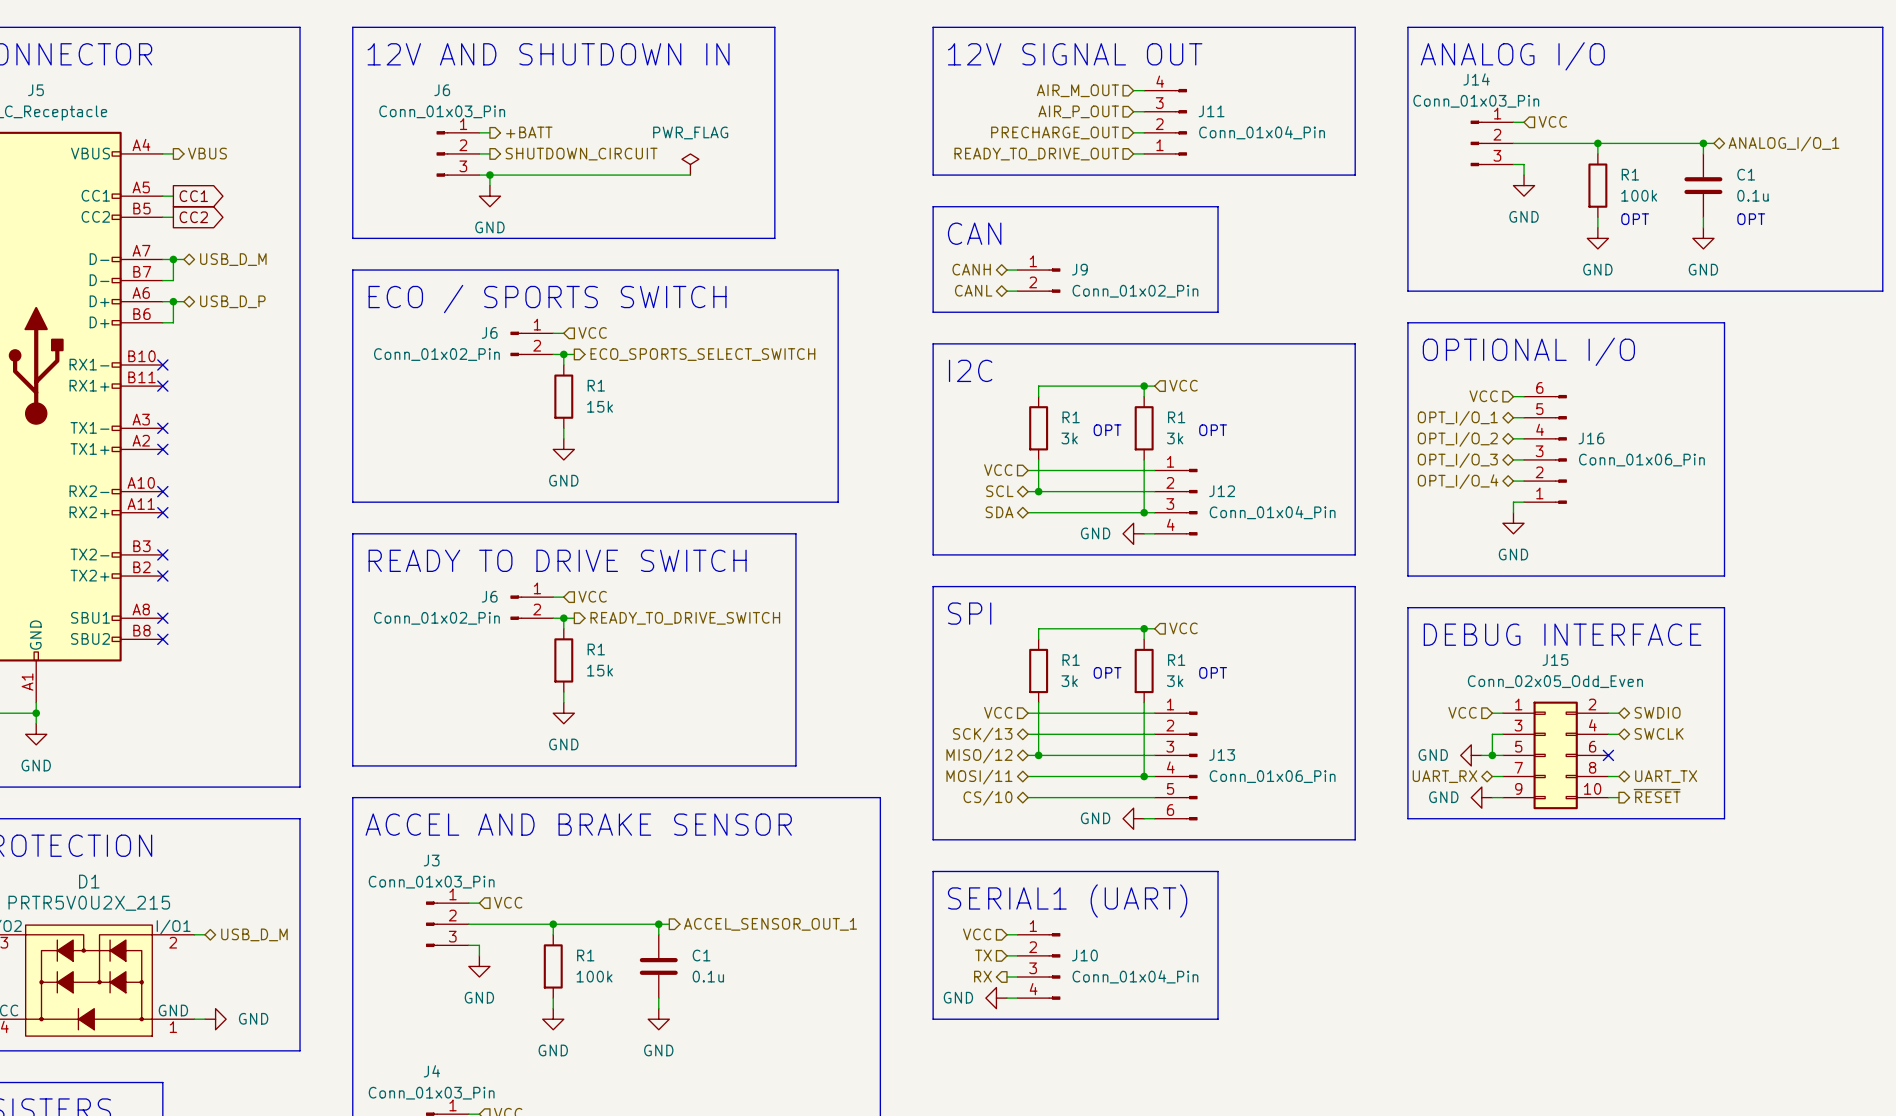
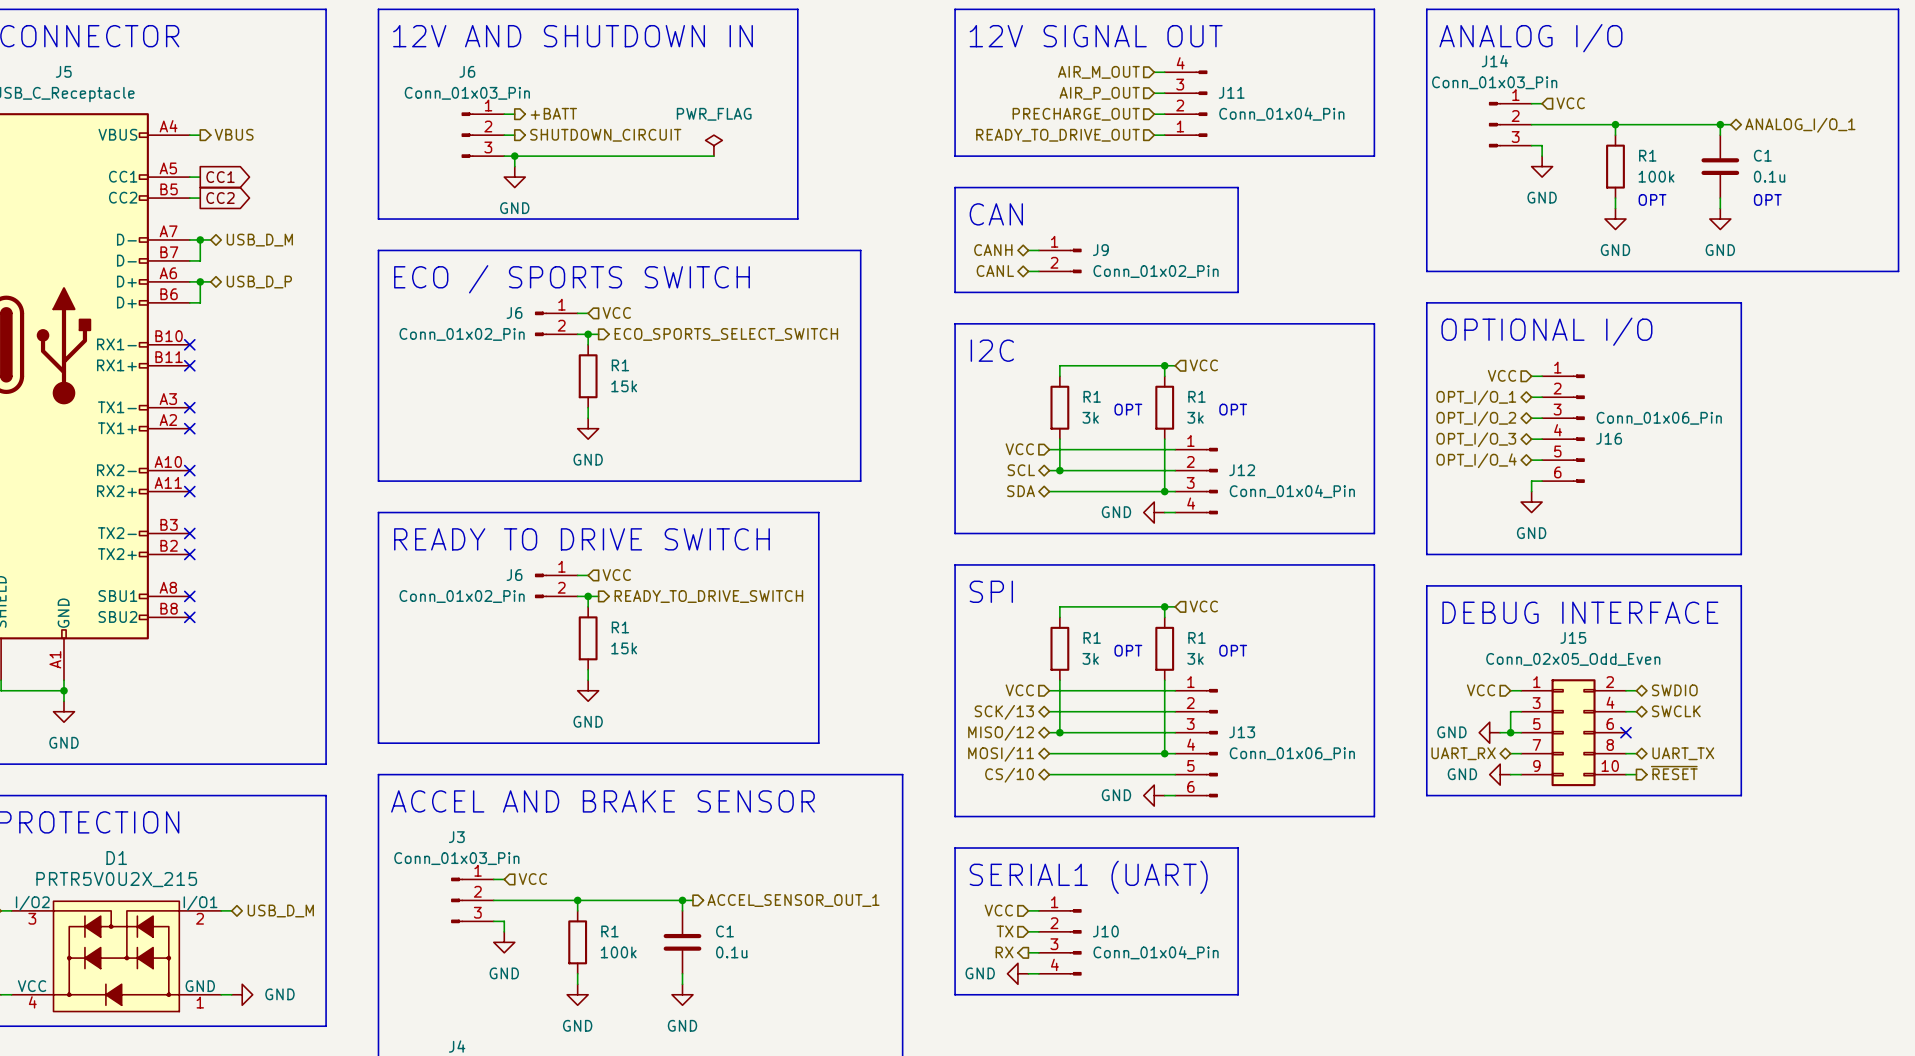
J16 flip: as is (1560, 449) -> up-down (1578, 428)

